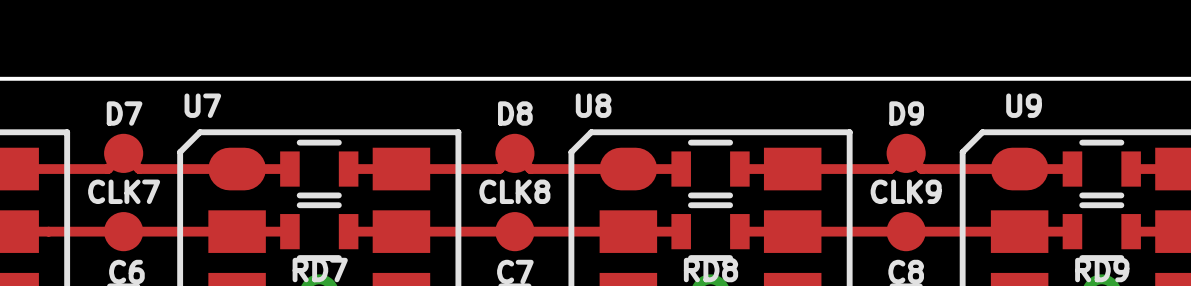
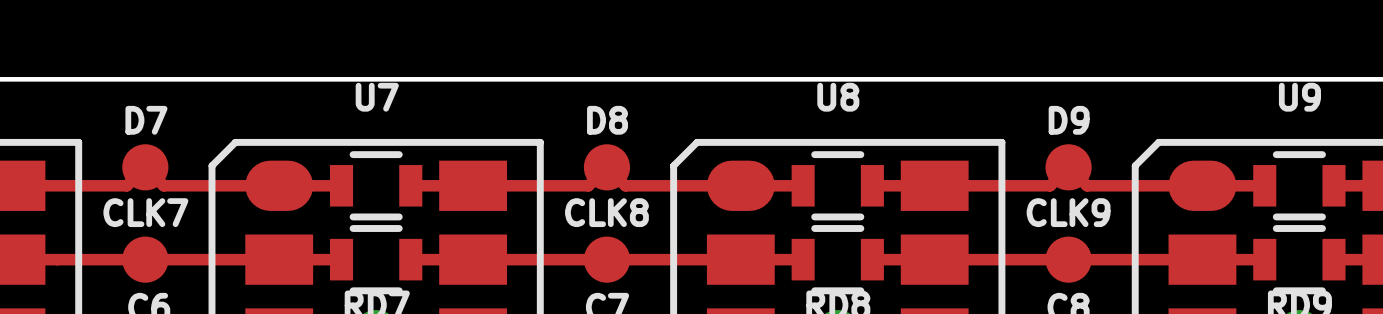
U7 name position: U7 (202, 105) -> U7 (377, 97)
U8 name position: U8 (593, 105) -> U8 (838, 97)
U9 name position: U9 (1024, 105) -> U9 (1299, 97)

